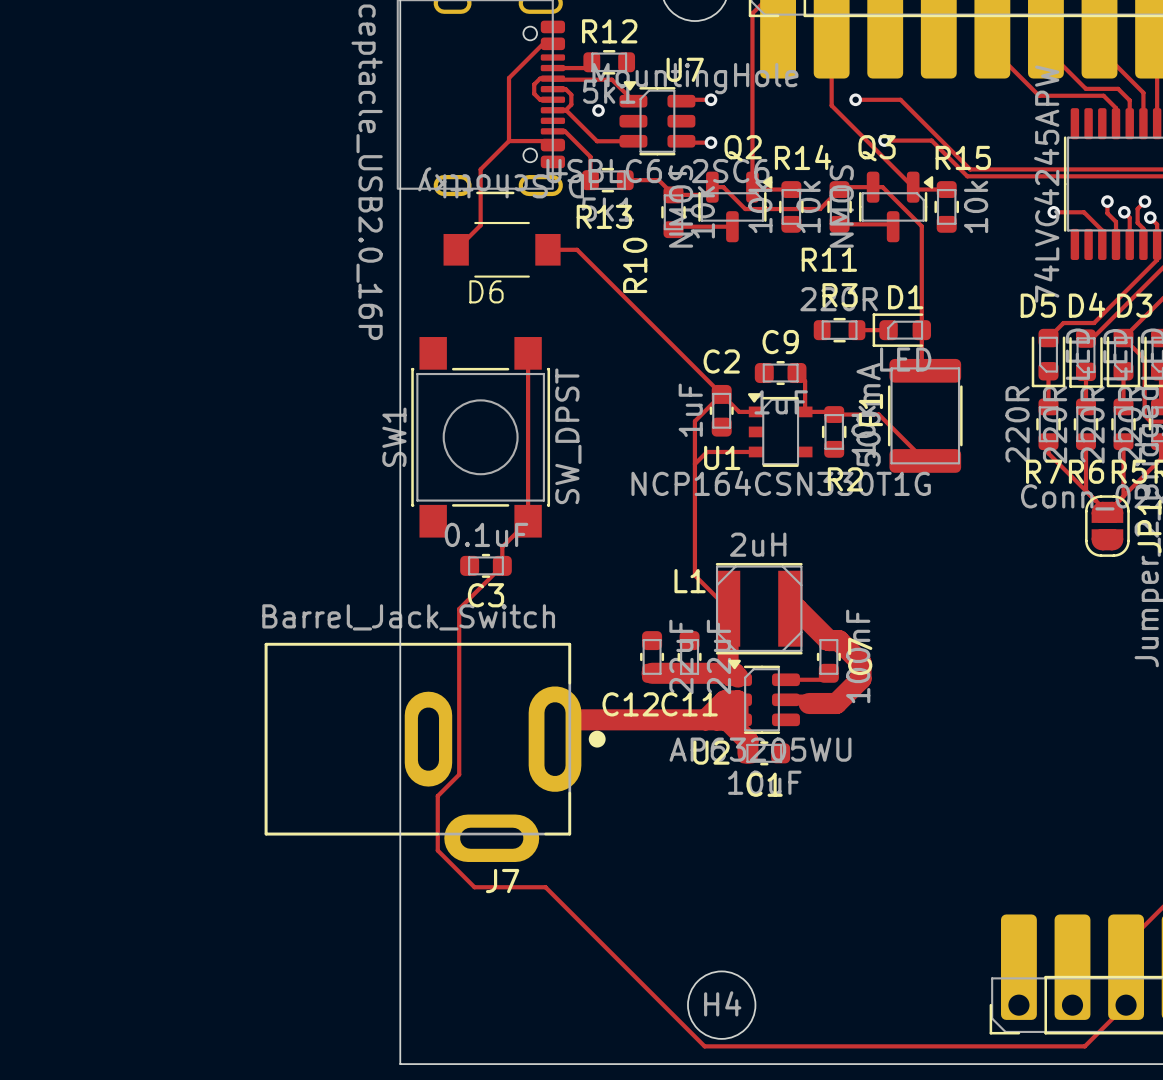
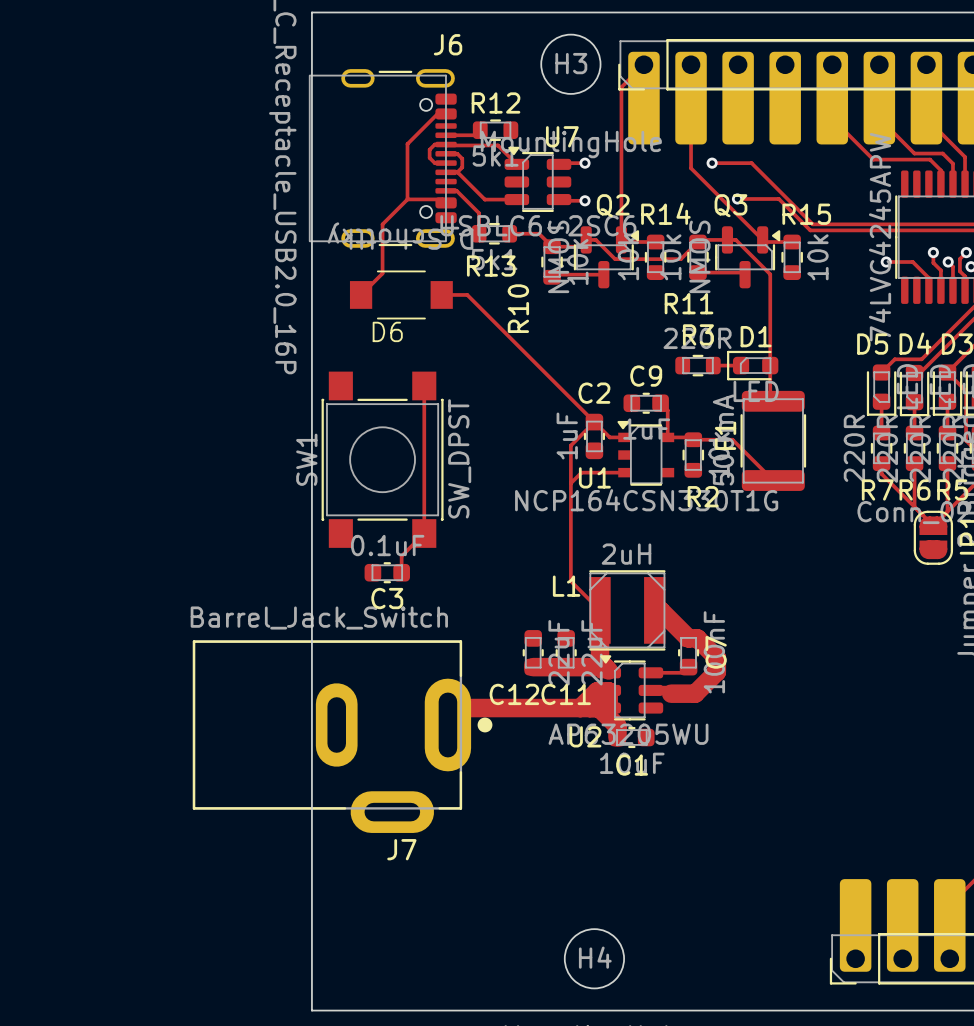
via: (598, 110) -> none
track: (502, 565) (459, 609) (459, 774) (437, 796) (437, 850) (474, 887) (545, 887) (704, 1046) (1084, 1046) (1126, 1005) -> none

